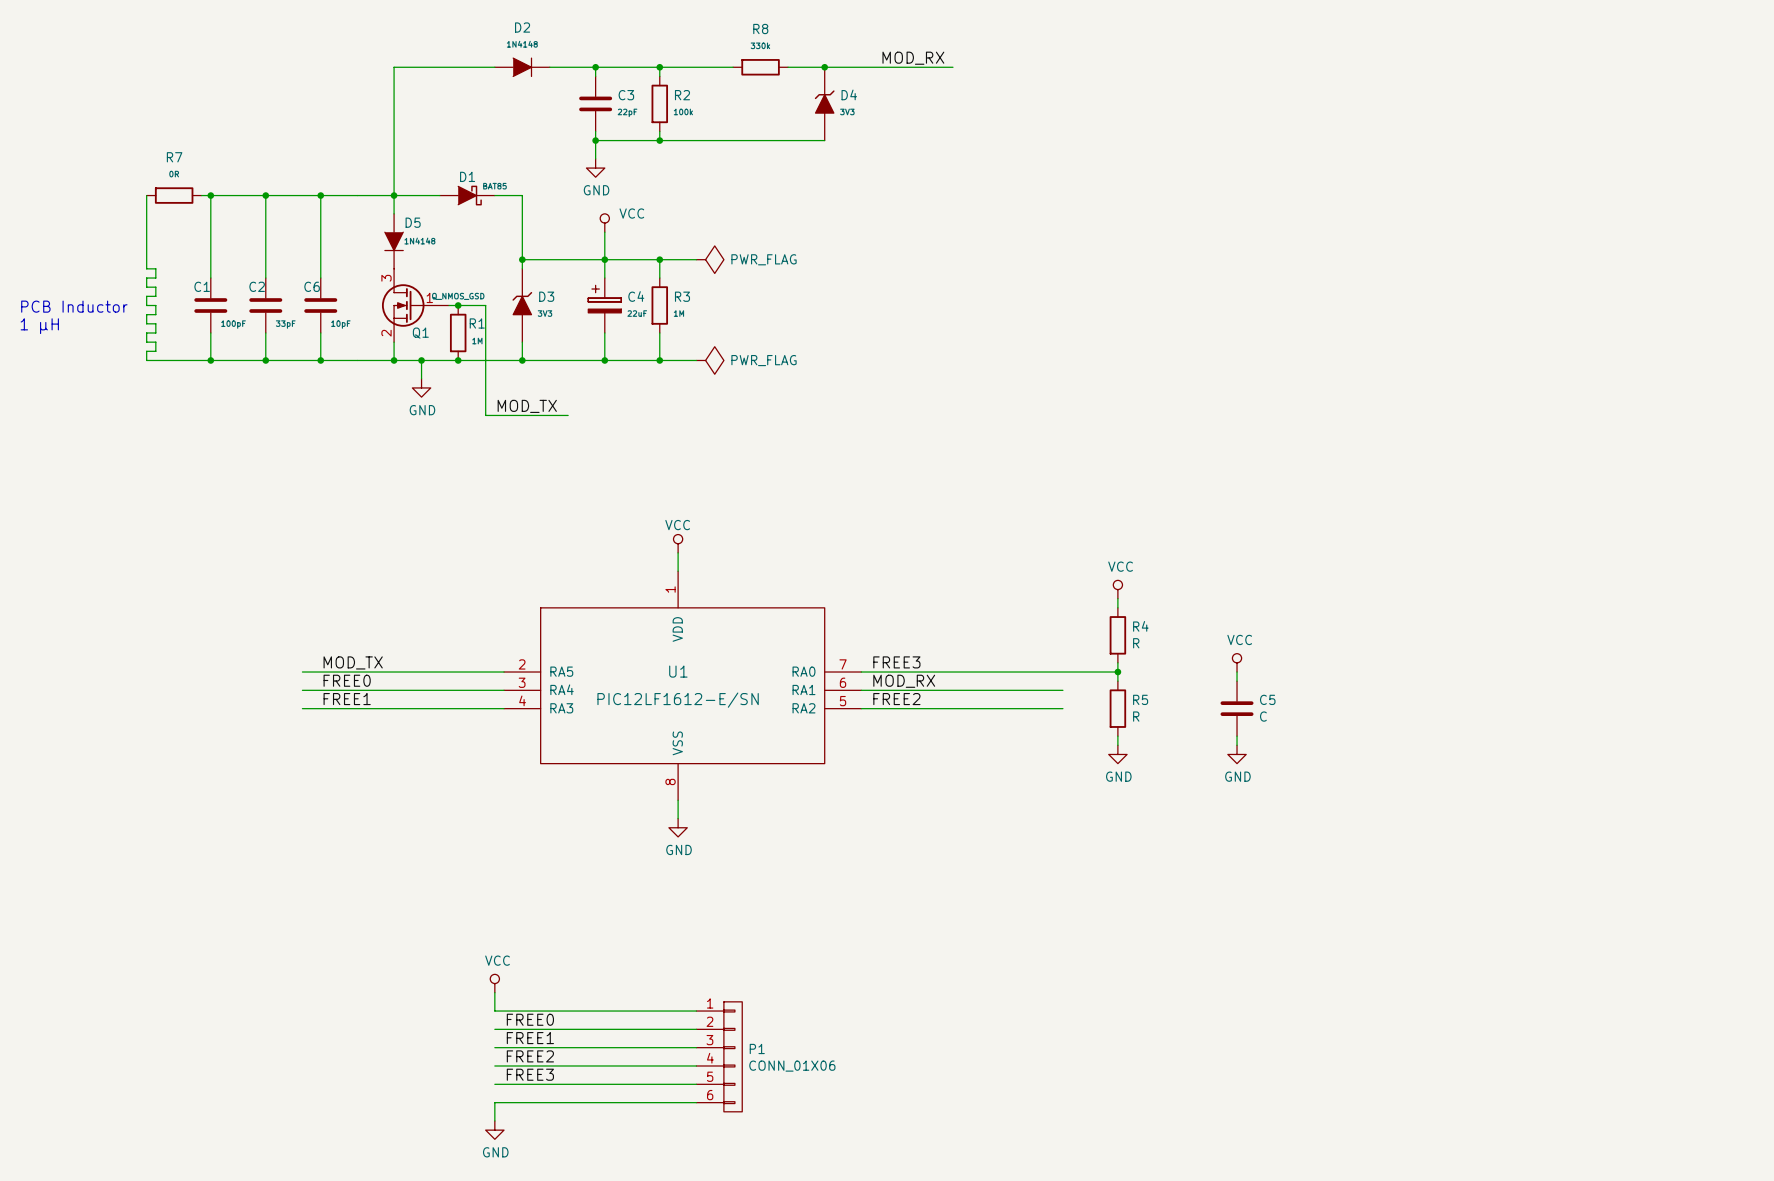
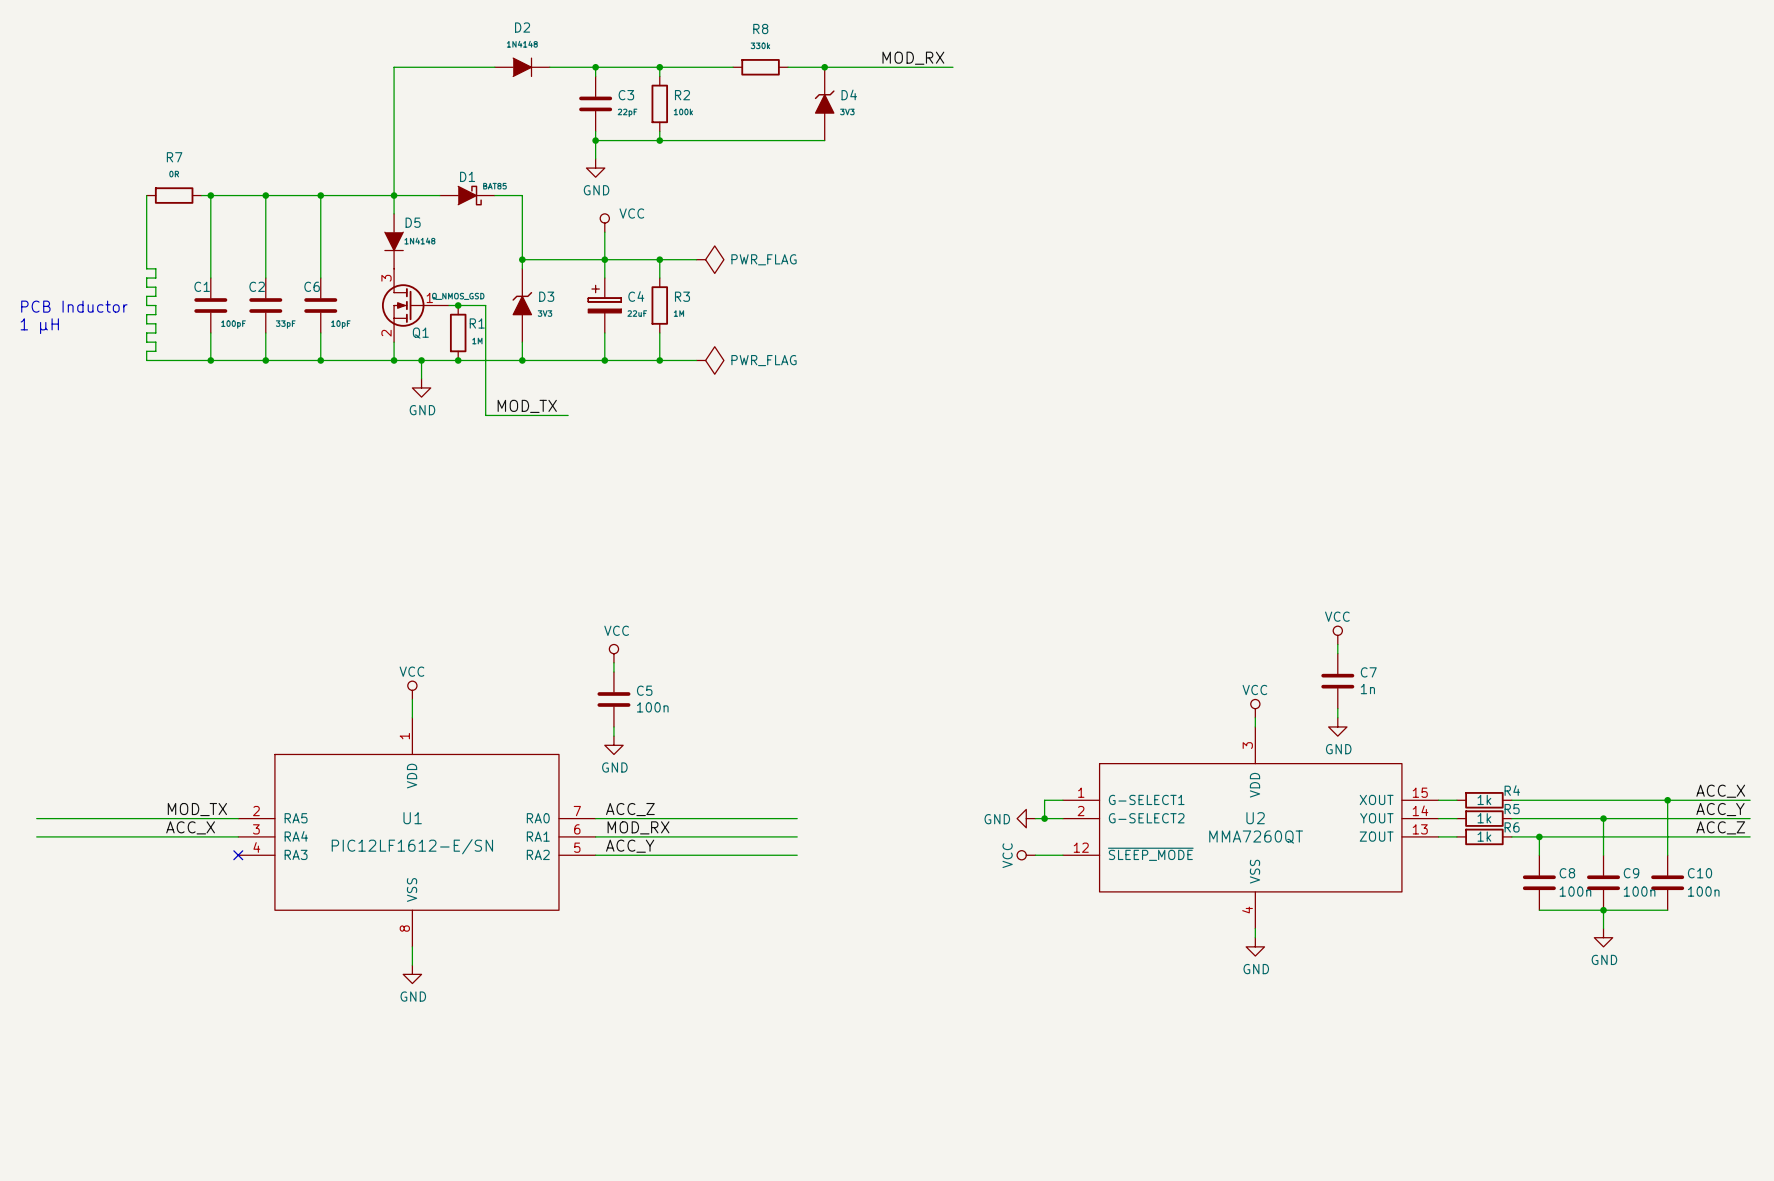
power symbol text position: VCC (677, 525) -> VCC (616, 630)
power symbol position: VCC (678, 543) -> VCC (613, 653)
wire: (678, 552) (678, 571) -> none
power symbol: VCC (1117, 589) -> none
wire: (1117, 598) (1117, 607) -> none
R4 rotation: 0° (1117, 635) -> 90° clockwise (1484, 800)
R4 position: (1117, 635) -> (1484, 800)
power symbol: none -> VCC (1337, 635)
power symbol text position: VCC (1239, 639) -> VCC (1254, 689)
R4 value: R (1136, 643) -> 1k (1484, 799)
label: MOD_TX (353, 662) -> none
wire: none -> (613, 662) (613, 672)
label: FREE3 (896, 662) -> none
wire: (1117, 662) (1117, 681) -> none
power symbol position: VCC (1237, 662) -> VCC (1255, 708)
wire: (302, 672) (504, 672) -> none
wire: (861, 672) (1117, 672) -> none
junction: (1117, 672) -> none
wire: (1237, 672) (1237, 681) -> (1337, 644) (1337, 653)
label: FREE0 (347, 680) -> none
label: MOD_RX (904, 681) -> none
C7: none -> 1n (1337, 681)
U1 position: (682, 685) -> (416, 832)
wire: (302, 690) (504, 690) -> none
power symbol: none -> VCC (412, 690)
wire: (861, 690) (1062, 690) -> none
label: FREE1 (347, 699) -> none
wire: none -> (412, 699) (412, 717)
label: FREE2 (896, 699) -> none
wire: (302, 708) (504, 708) -> none
wire: (861, 708) (1062, 708) -> none
R5 rotation: 0° (1117, 708) -> 90° clockwise (1484, 818)
R5 position: (1117, 708) -> (1484, 818)
C5 position: (1237, 708) -> (613, 699)
R5 value: R (1136, 716) -> 1k (1484, 818)
C5 value: C (1263, 716) -> 100n (652, 707)
wire: none -> (613, 726) (613, 736)
power symbol: none -> GND (1337, 726)
wire: (1117, 736) (1117, 745) -> (1255, 717) (1255, 726)
wire: (1237, 736) (1237, 745) -> (1337, 708) (1337, 717)
power symbol: GND (1117, 754) -> none
power symbol: GND (1237, 754) -> none
label: none -> ACC_X (1720, 791)
wire: (678, 800) (678, 818) -> none
wire: none -> (1062, 800) (1044, 800) (1044, 818)
wire: none -> (1438, 800) (1456, 800)
wire: none -> (1511, 800) (1750, 800)
wire: none -> (1667, 800) (1667, 855)
junction: none -> (1667, 800)
label: none -> MOD_TX (197, 809)
label: none -> ACC_Z (630, 809)
label: none -> ACC_Y (1720, 809)
wire: none -> (36, 818) (238, 818)
wire: none -> (595, 818) (797, 818)
power symbol: none -> GND (1026, 818)
wire: none -> (1035, 818) (1062, 818)
junction: none -> (1044, 818)
wire: none -> (1438, 818) (1456, 818)
wire: none -> (1511, 818) (1750, 818)
wire: none -> (1603, 818) (1603, 855)
junction: none -> (1603, 818)
label: none -> ACC_X (190, 827)
label: none -> MOD_RX (638, 827)
power symbol position: GND (678, 827) -> GND (613, 745)
U2: none -> MMA7260QT (1250, 827)
label: none -> ACC_Z (1720, 827)
wire: none -> (36, 836) (238, 836)
wire: none -> (595, 836) (797, 836)
wire: none -> (1438, 836) (1456, 836)
R6: none -> 1k (1484, 836)
wire: none -> (1511, 836) (1750, 836)
wire: none -> (1539, 836) (1539, 855)
junction: none -> (1539, 836)
label: none -> ACC_Y (630, 846)
no-connect mark: none -> (238, 855)
wire: none -> (595, 855) (797, 855)
power symbol: none -> VCC (1026, 855)
wire: none -> (1035, 855) (1062, 855)
C8: none -> 100n (1539, 882)
C9: none -> 100n (1603, 882)
C10: none -> 100n (1667, 882)
wire: none -> (1539, 910) (1667, 910)
wire: none -> (1603, 910) (1603, 928)
junction: none -> (1603, 910)
wire: none -> (1255, 928) (1255, 937)
power symbol: none -> GND (1603, 937)
wire: none -> (412, 946) (412, 965)
power symbol: none -> GND (1255, 946)
power symbol: none -> GND (412, 974)
power symbol: VCC (494, 983) -> none
wire: (494, 992) (494, 1011) (696, 1011) -> none
label: FREE0 (530, 1019) -> none
wire: (494, 1029) (696, 1029) -> none
label: FREE1 (530, 1038) -> none
wire: (494, 1047) (696, 1047) -> none
label: FREE2 (530, 1056) -> none
P1: CONN_01X06 (719, 1056) -> none
wire: (494, 1065) (696, 1065) -> none
label: FREE3 (530, 1074) -> none
wire: (494, 1084) (696, 1084) -> none
wire: (696, 1102) (494, 1102) (494, 1120) -> none
power symbol: GND (494, 1130) -> none

